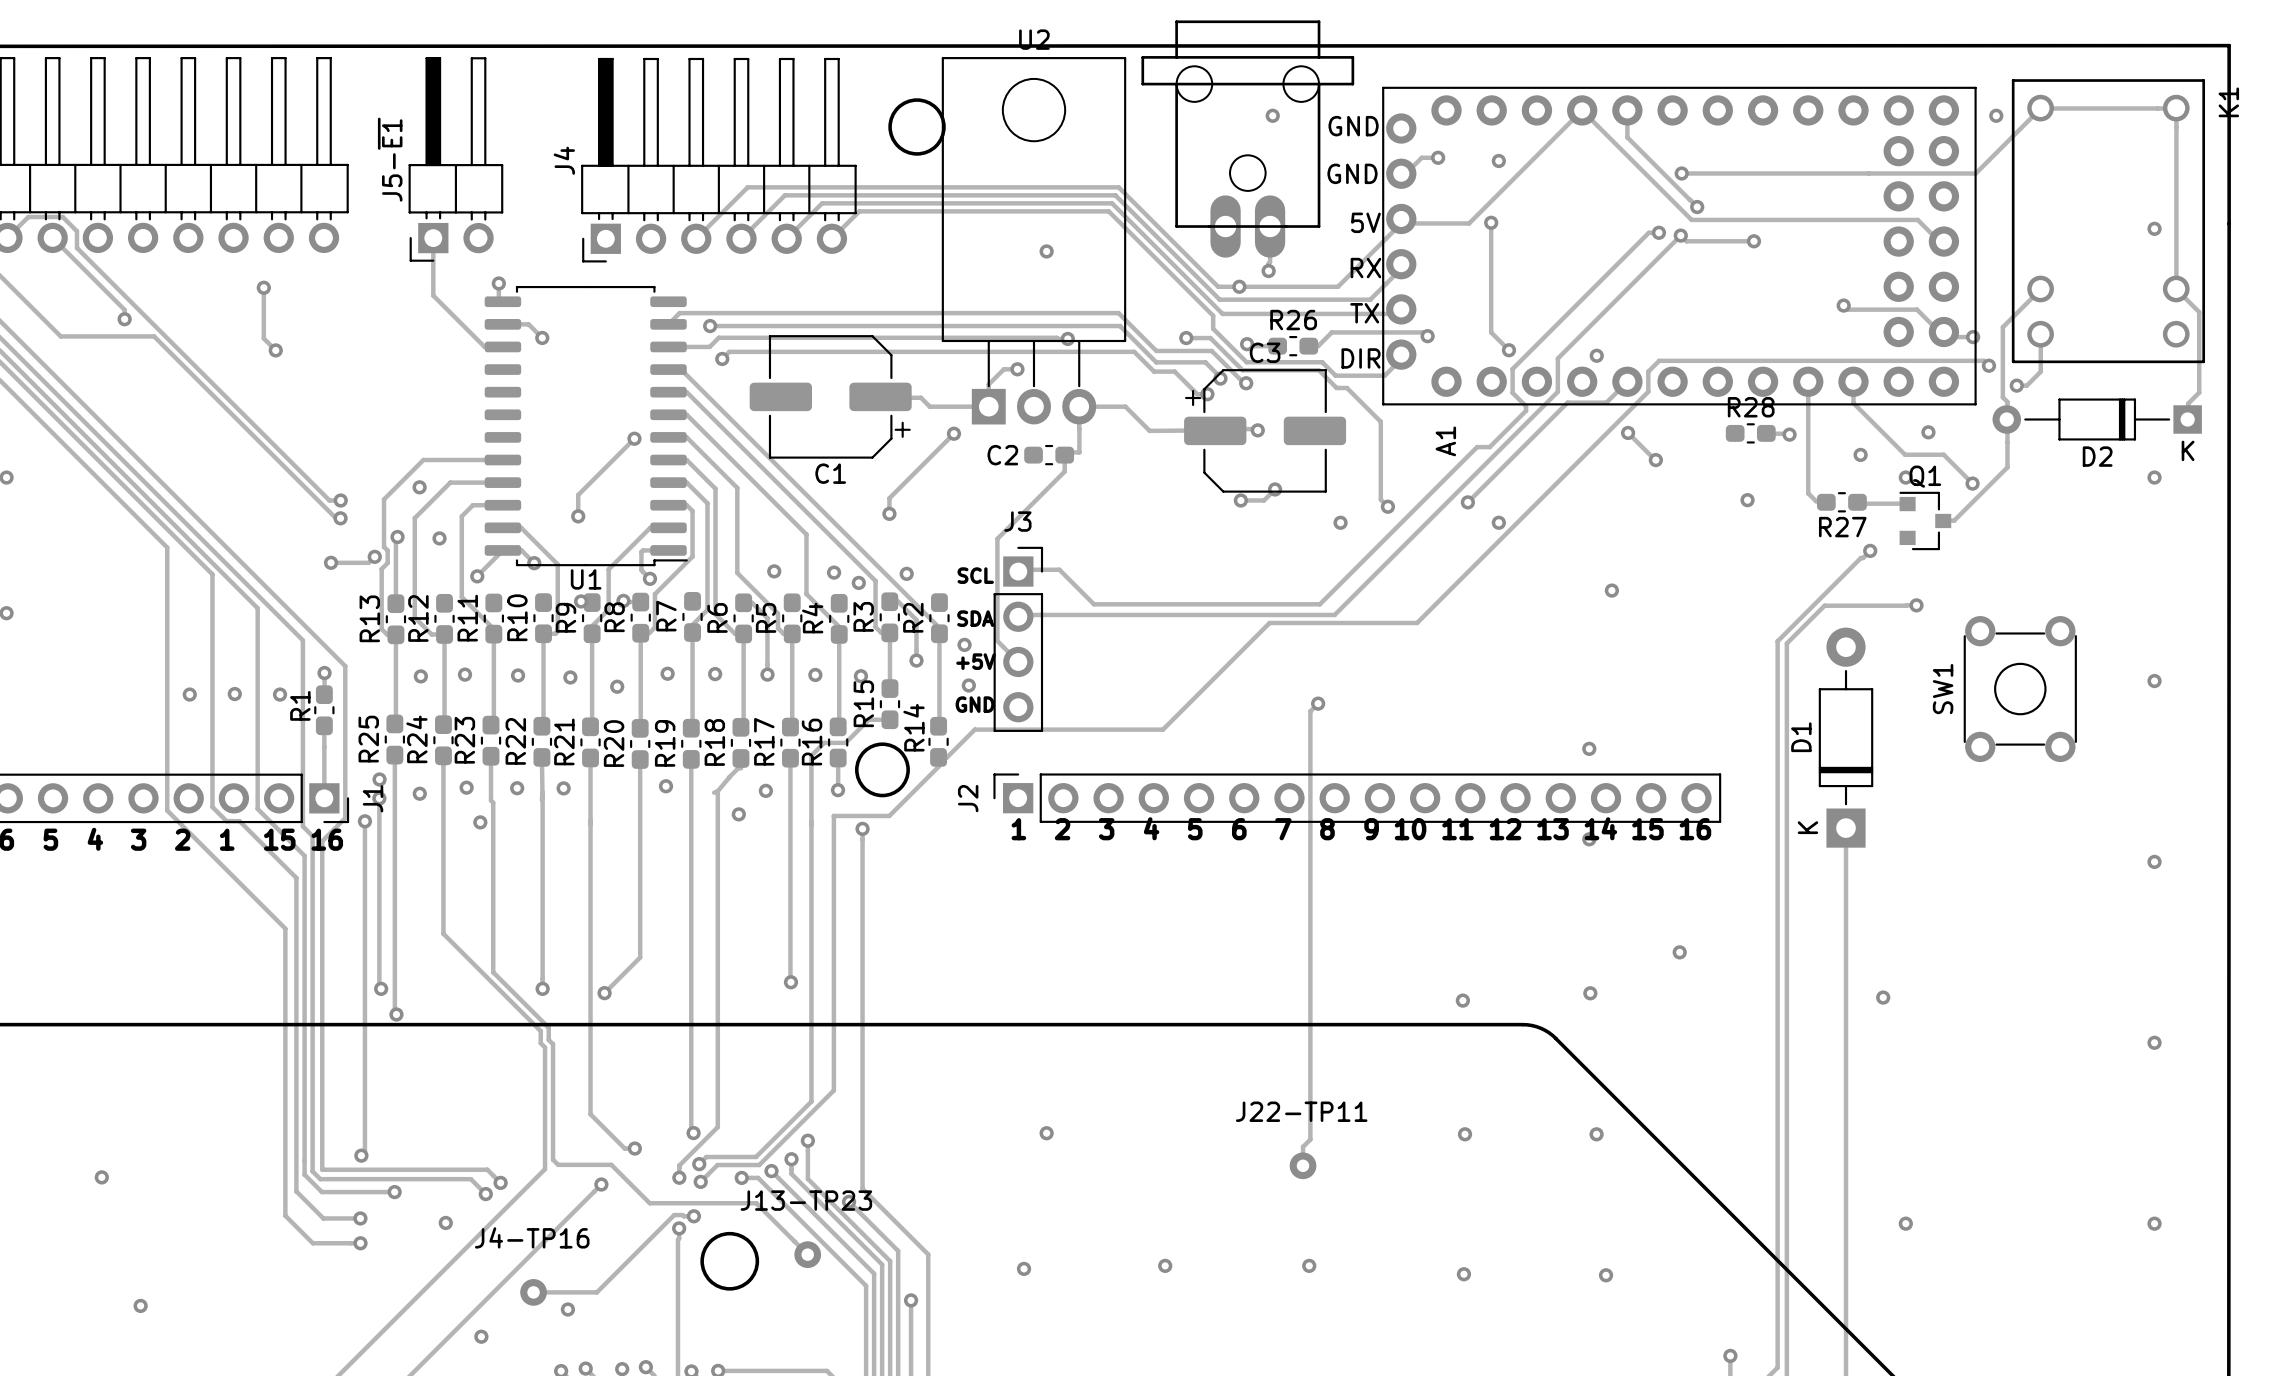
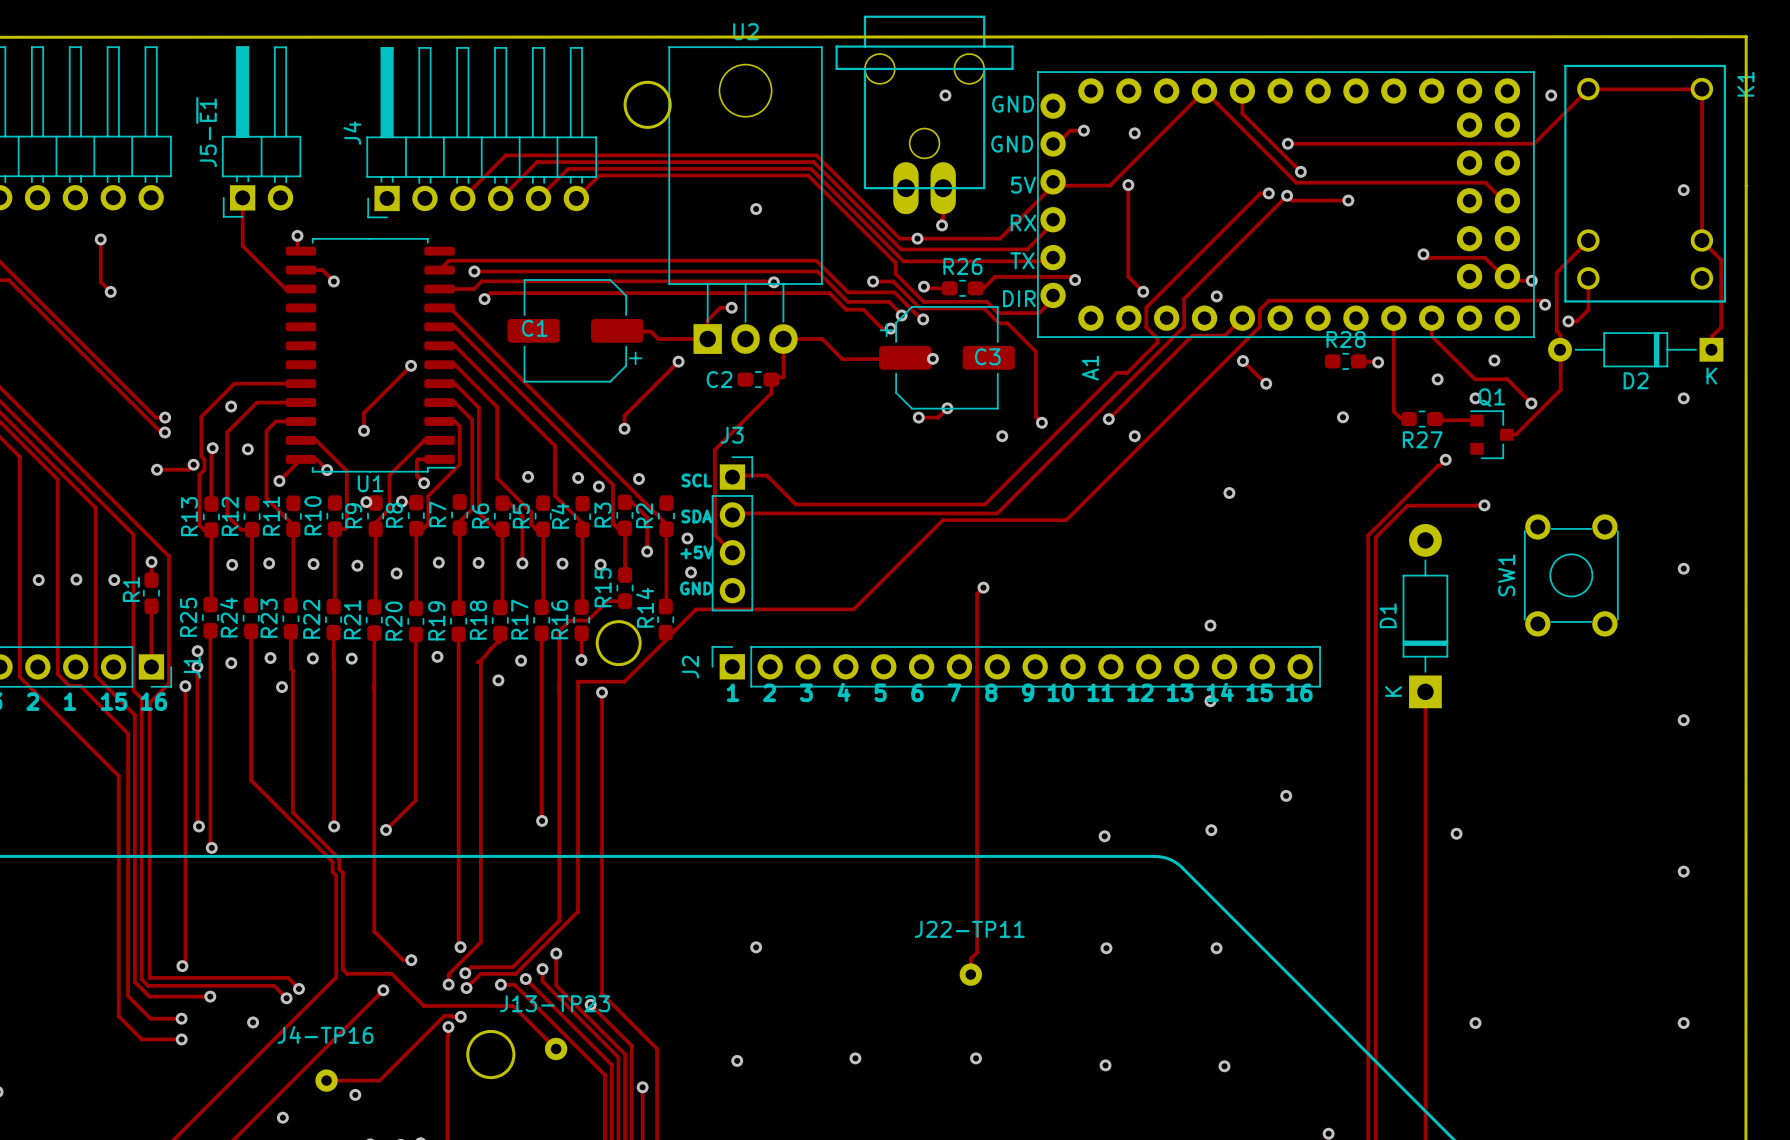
C3 name position: C3 (1265, 352) -> C3 (987, 356)
C3 footprint: [1184, 369, 1347, 493] -> [879, 306, 1015, 410]
C1 name position: C1 (830, 473) -> C1 (534, 328)

